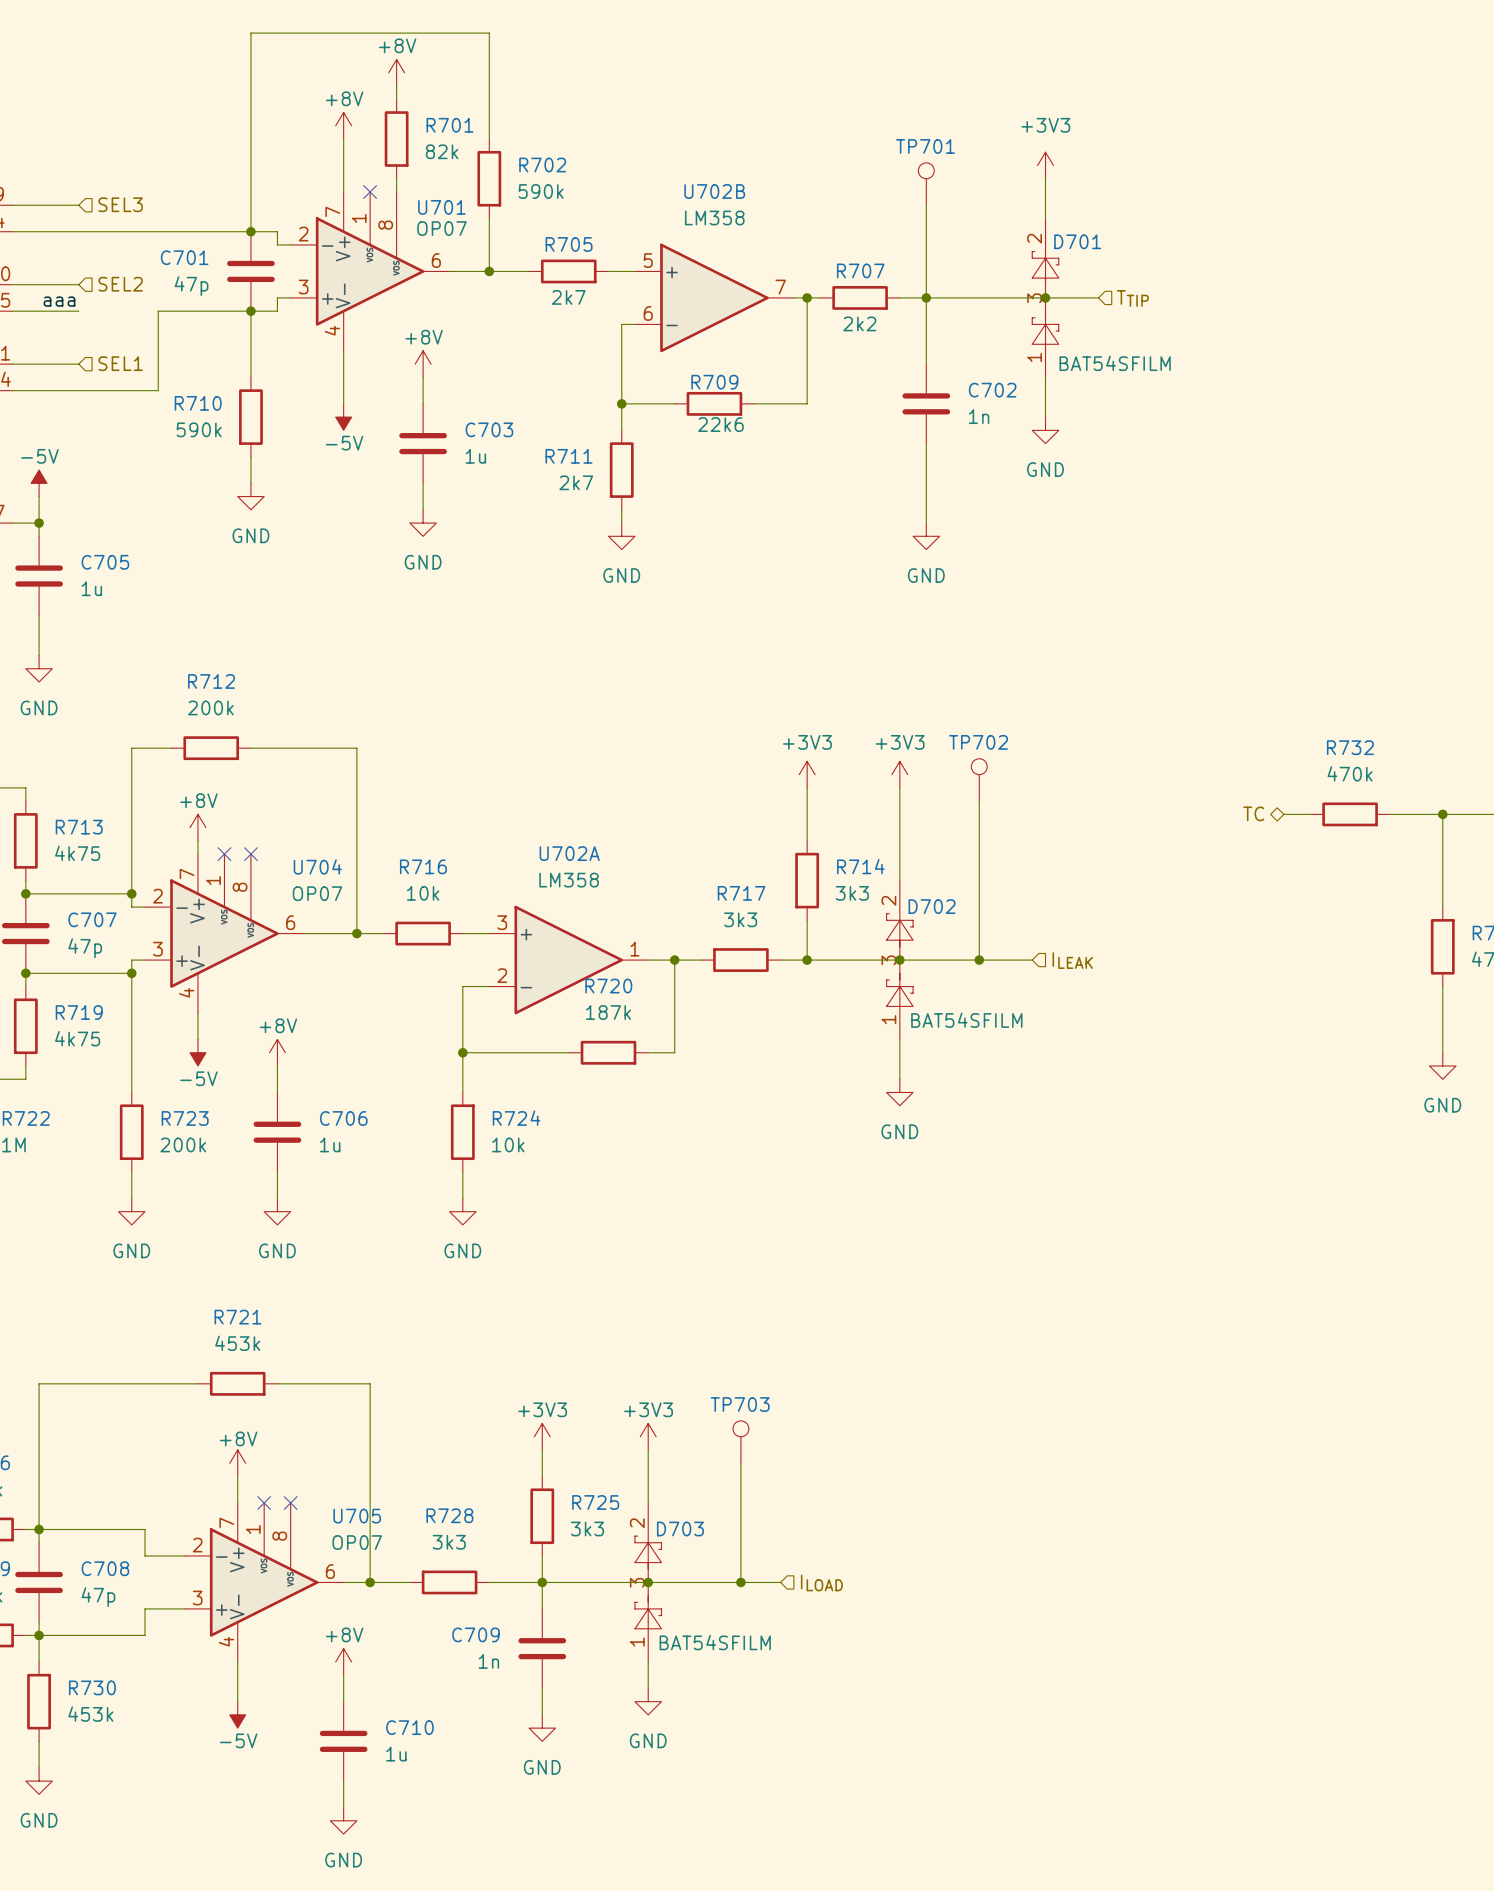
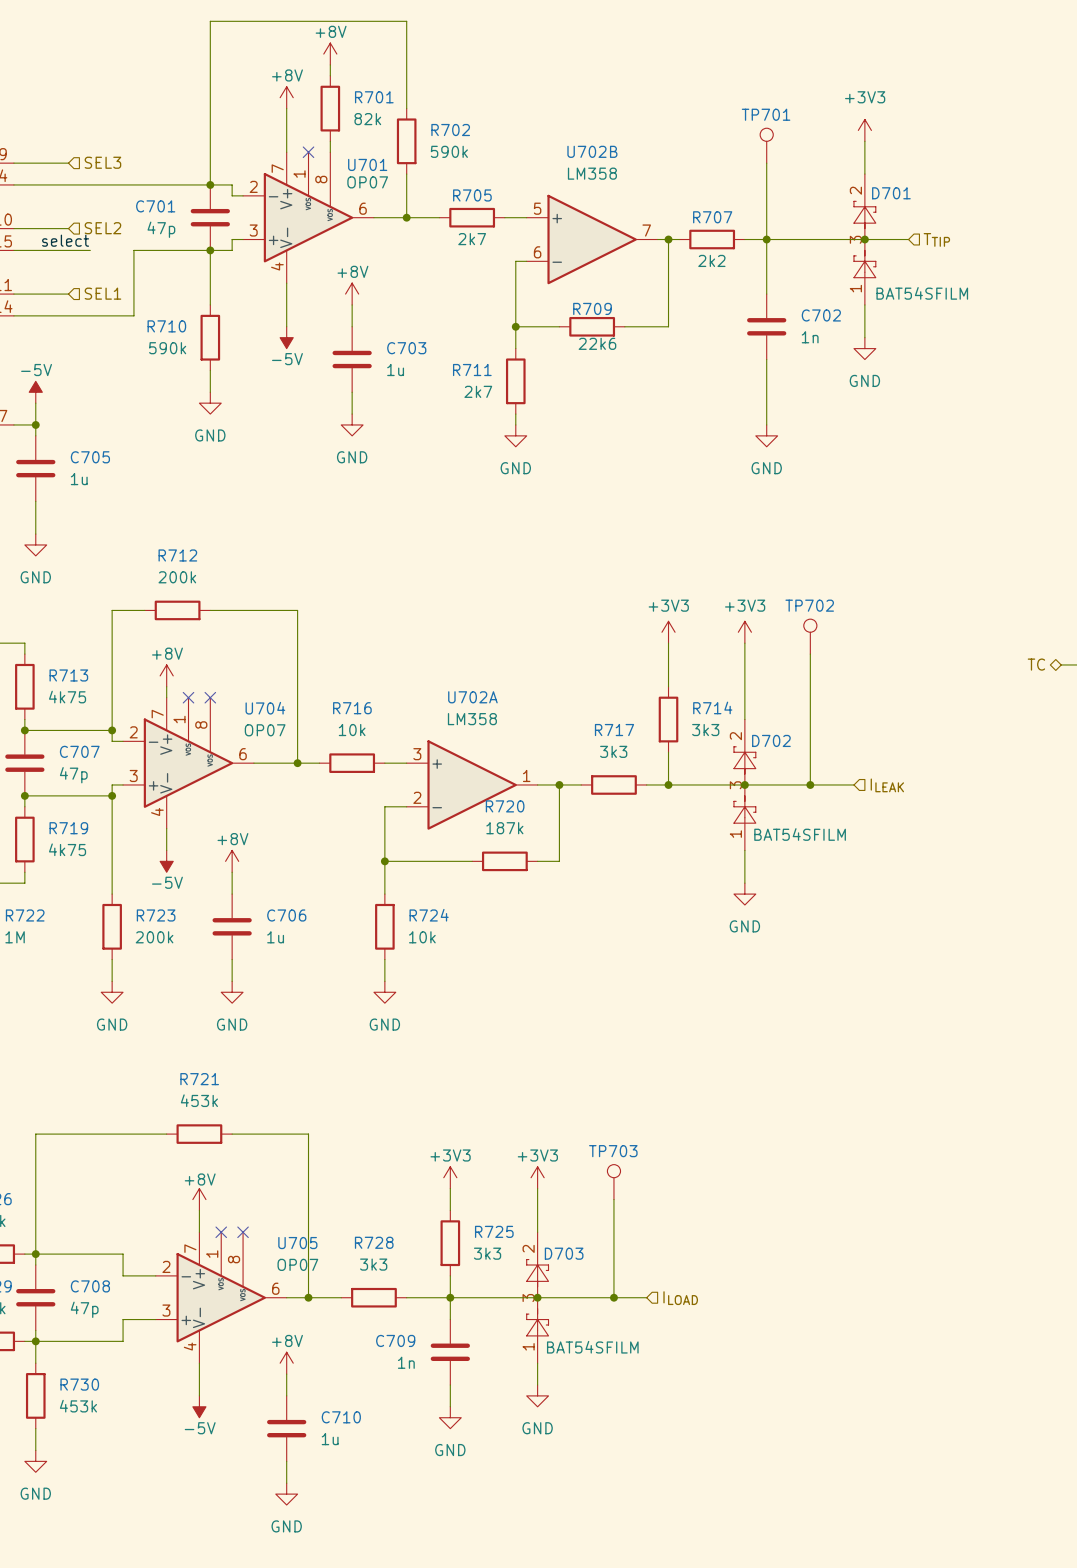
label: none -> select (65, 240)
label: aaa (59, 301) -> none
wire: none -> (68, 250) (90, 250)

